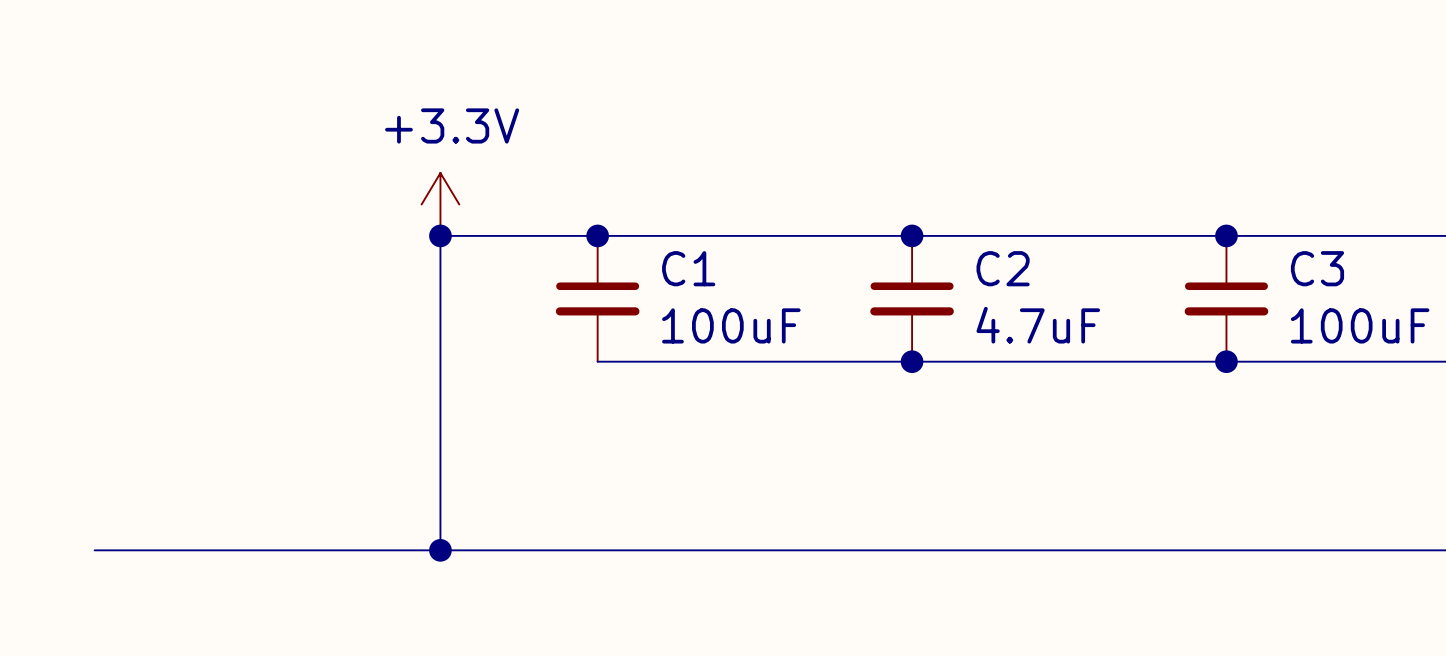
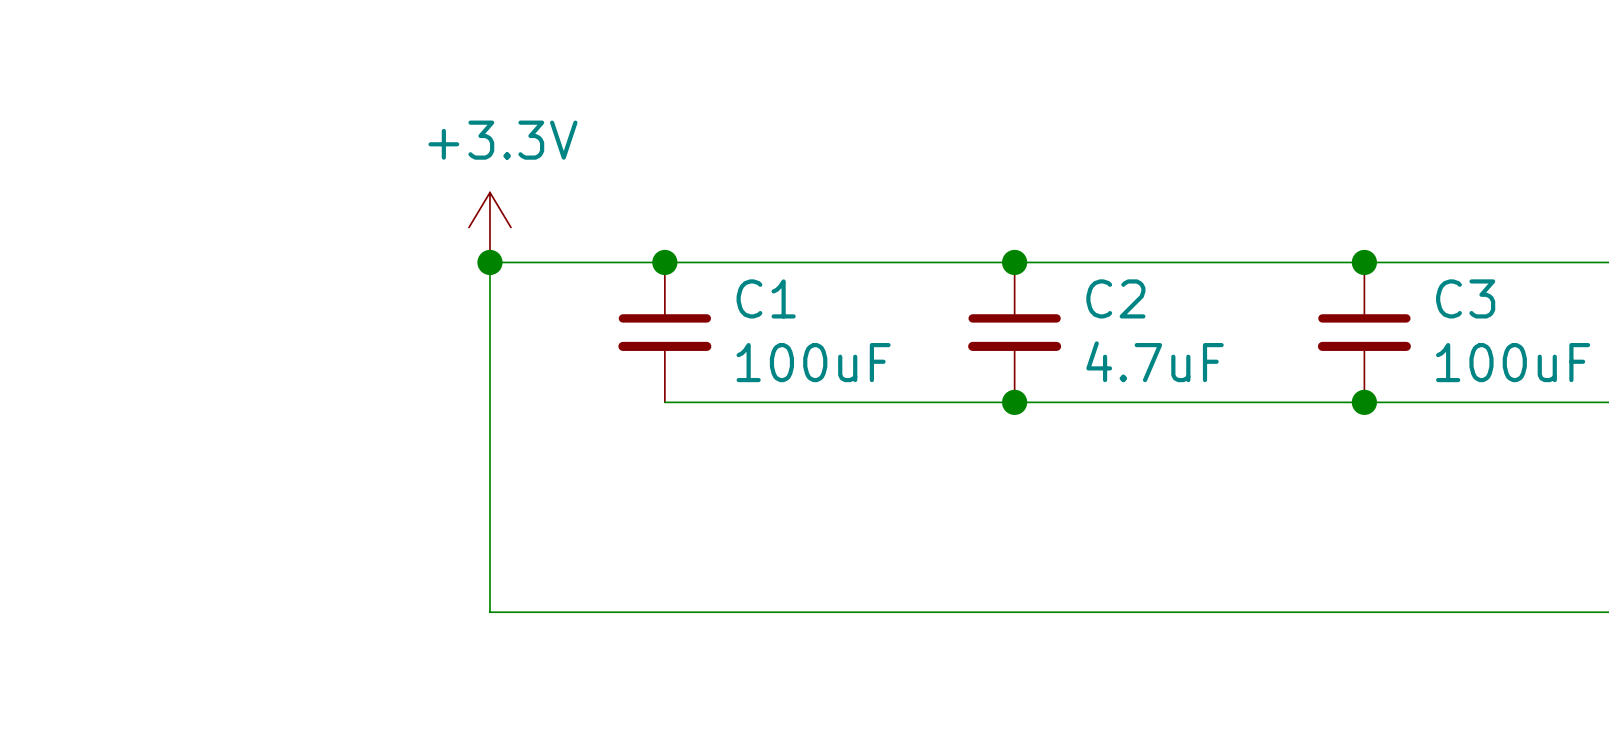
wire: (94, 550) (440, 550) -> none
junction: (440, 550) -> none

